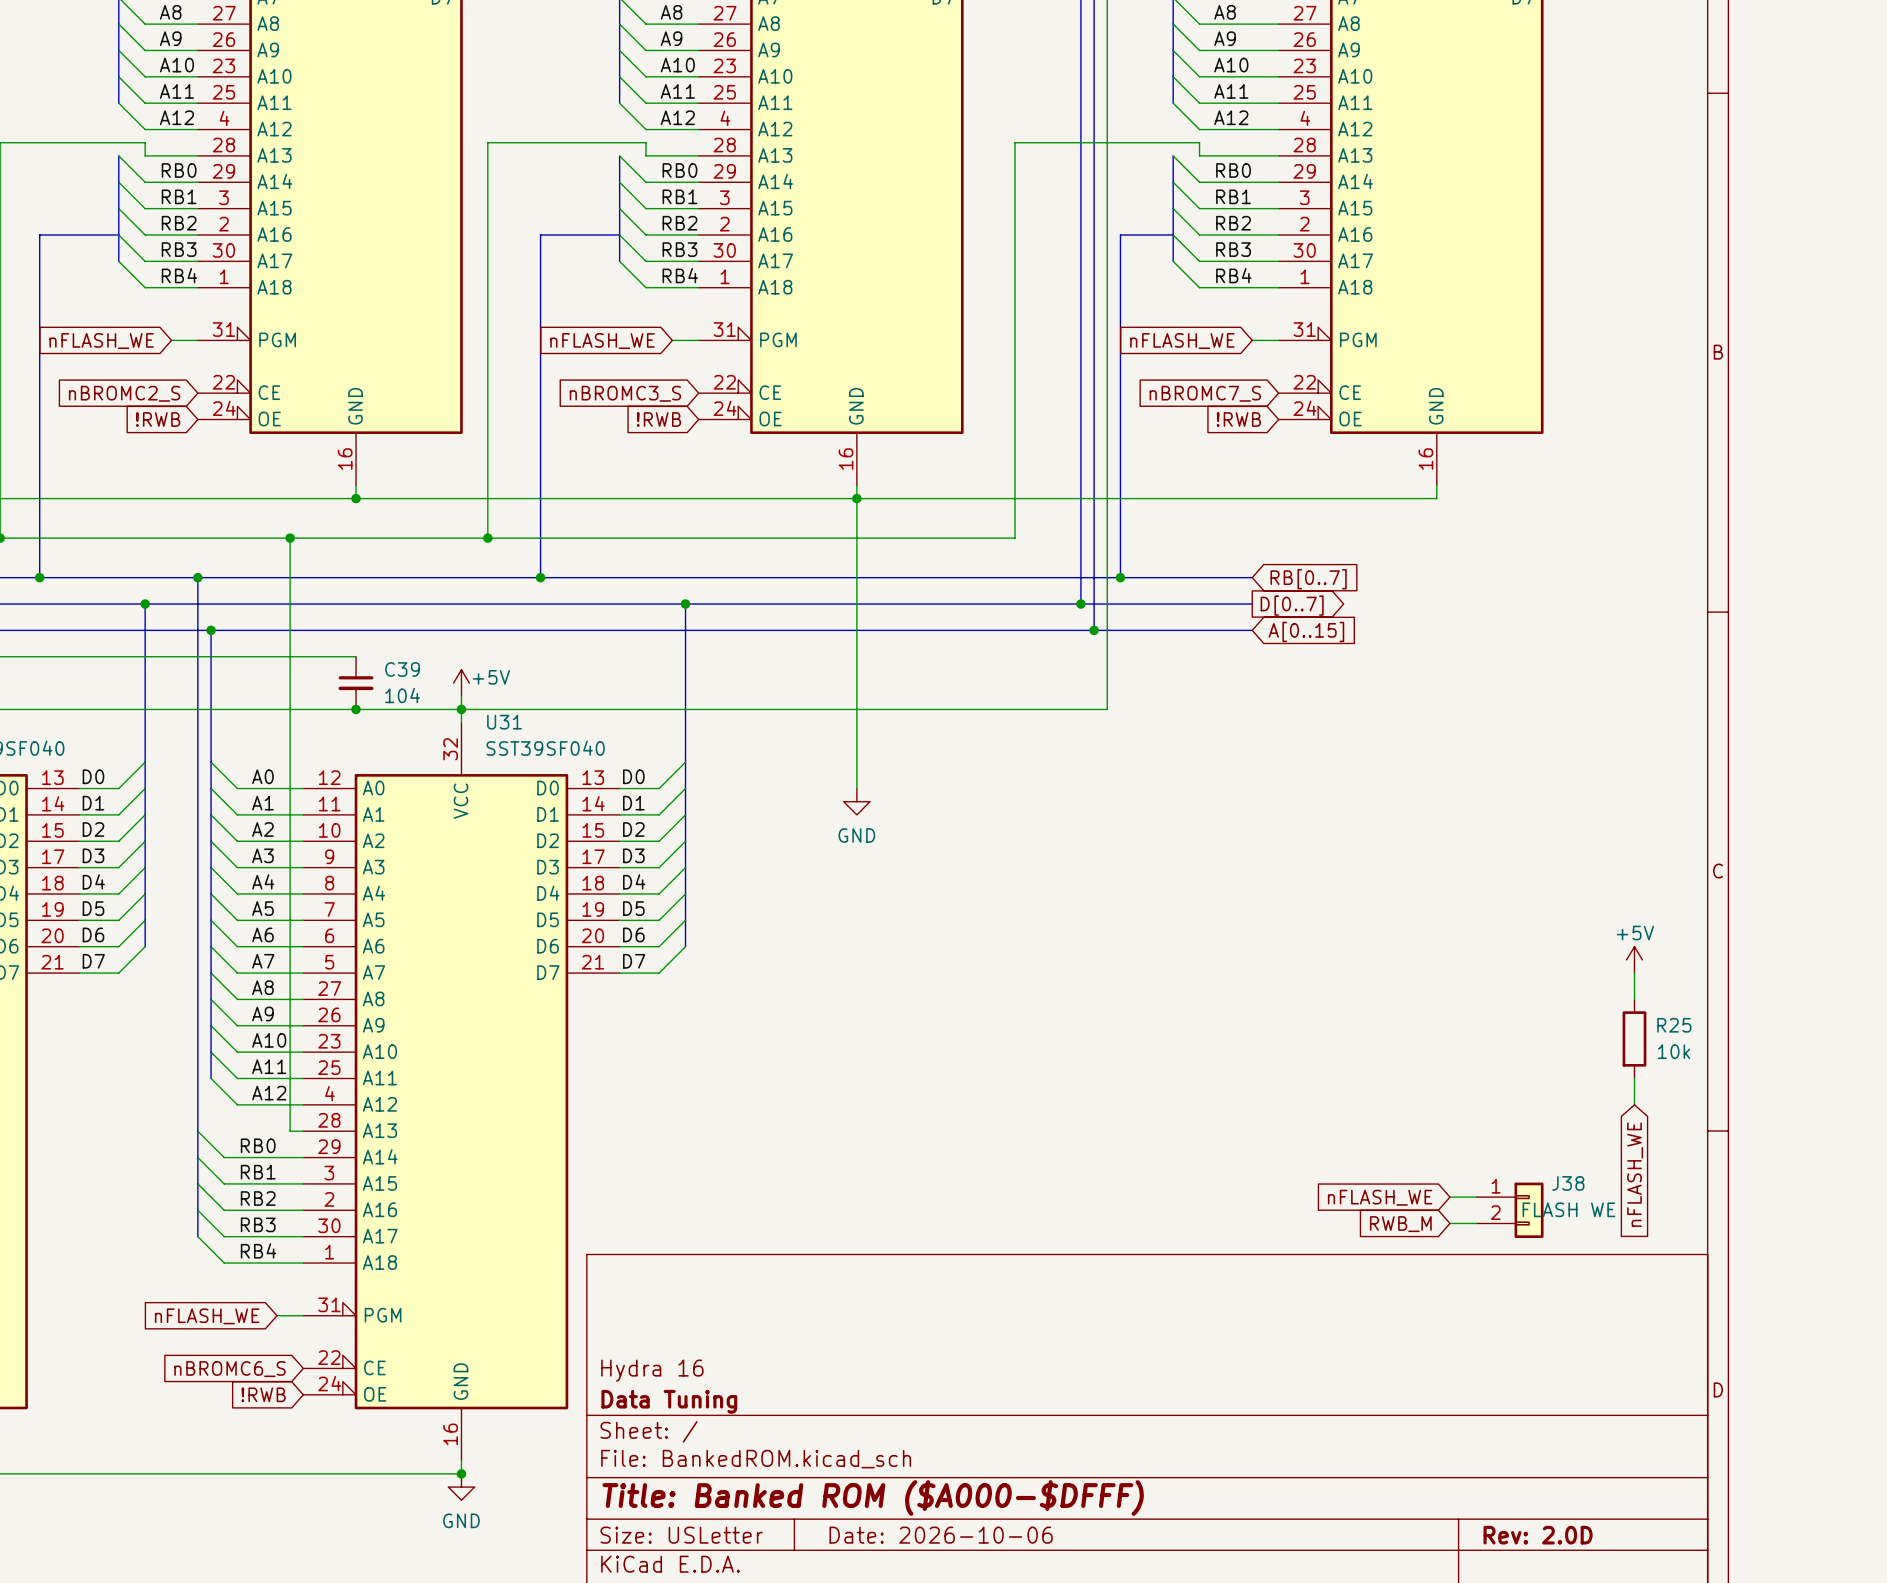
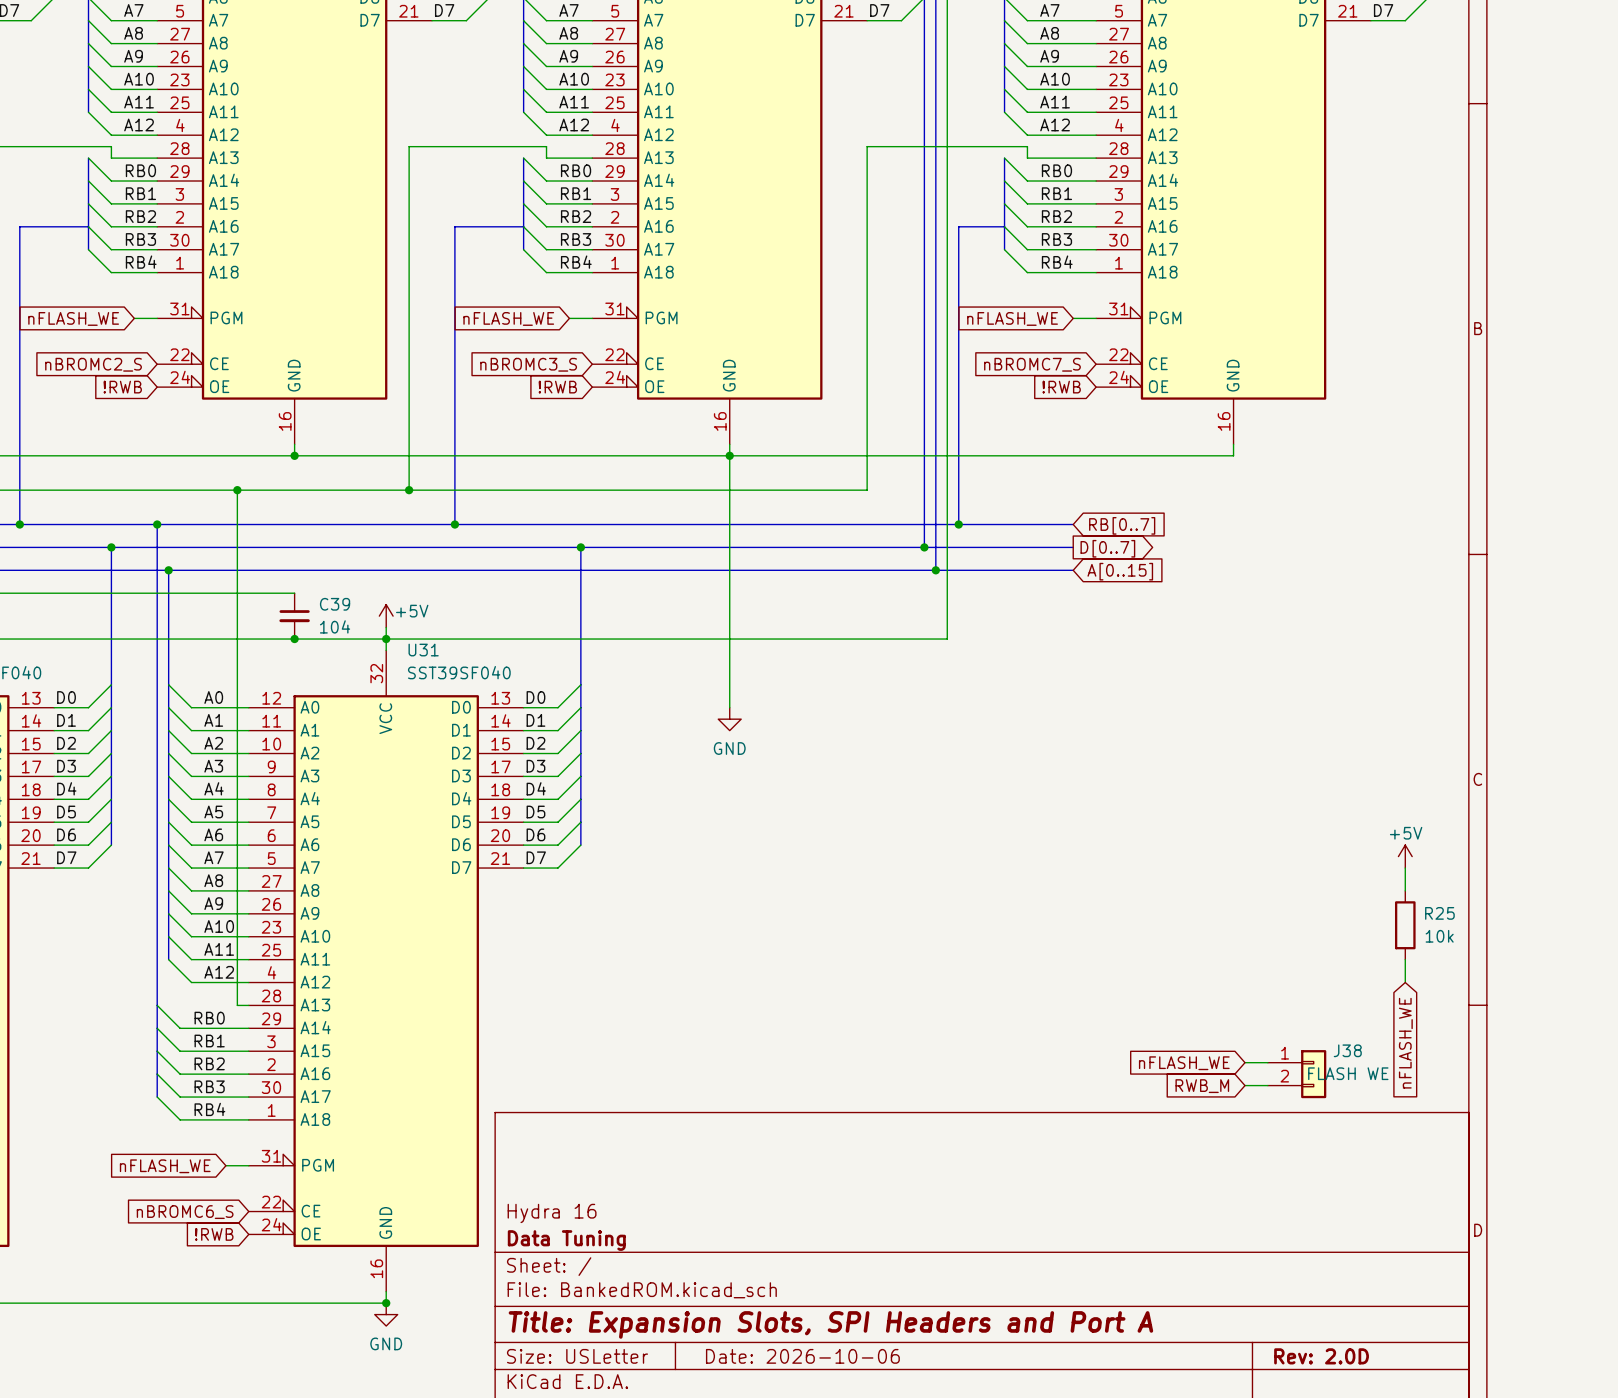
title block: Title: Banked ROM ($A000-$DFFF) (873, 1498) -> Title: Expansion Slots, SPI Headers and Port A (830, 1324)

